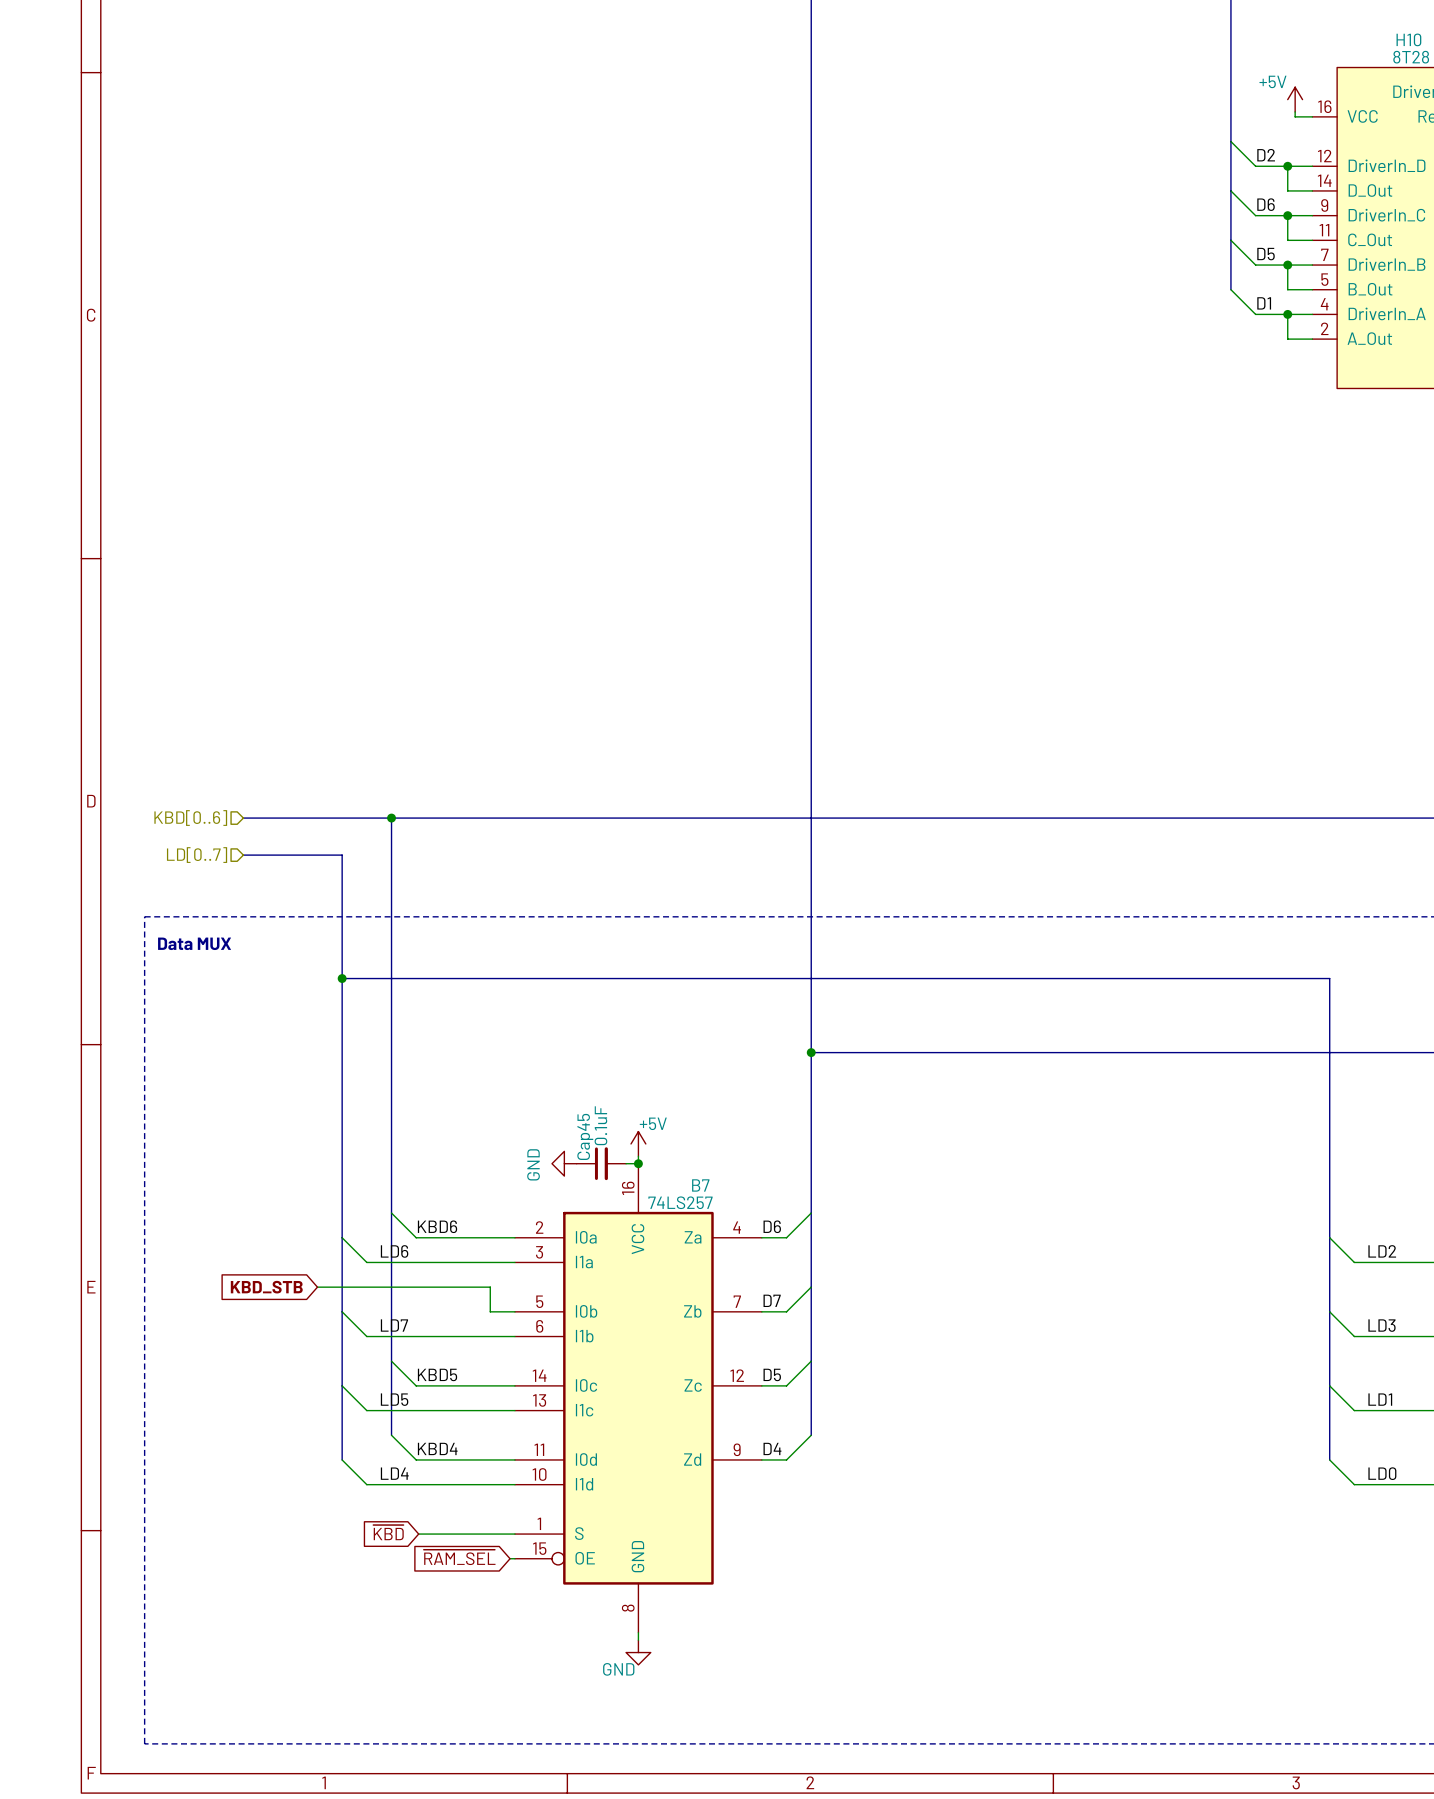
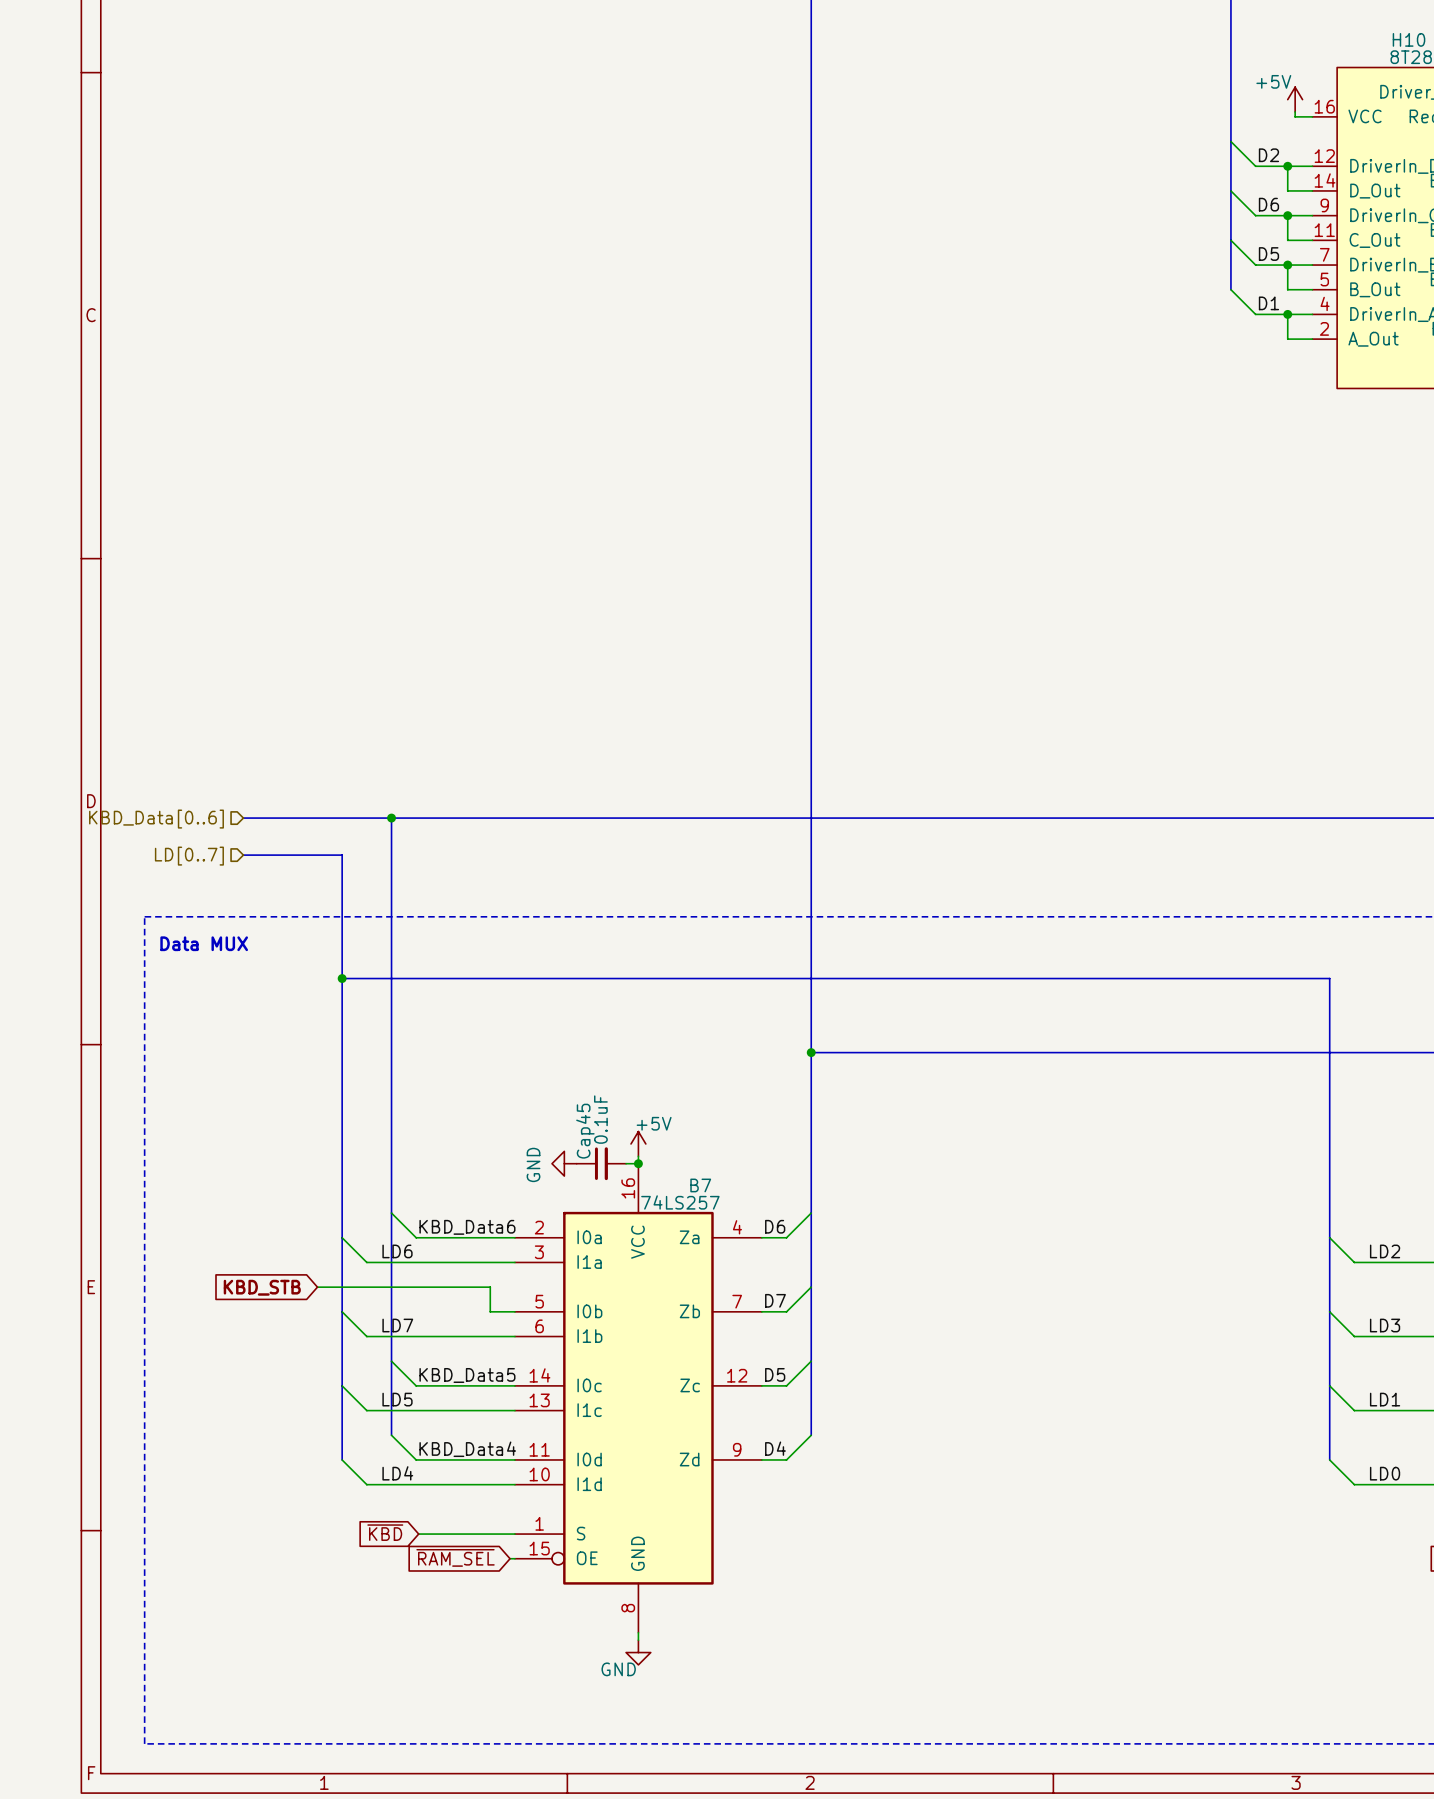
hierarchical label: KBD[0..6] (190, 818) -> KBD_Data[0..6] (156, 819)
label: KBD6 (437, 1226) -> KBD_Data6 (467, 1227)
label: KBD5 (437, 1374) -> KBD_Data5 (467, 1375)
label: KBD4 (437, 1448) -> KBD_Data4 (467, 1449)

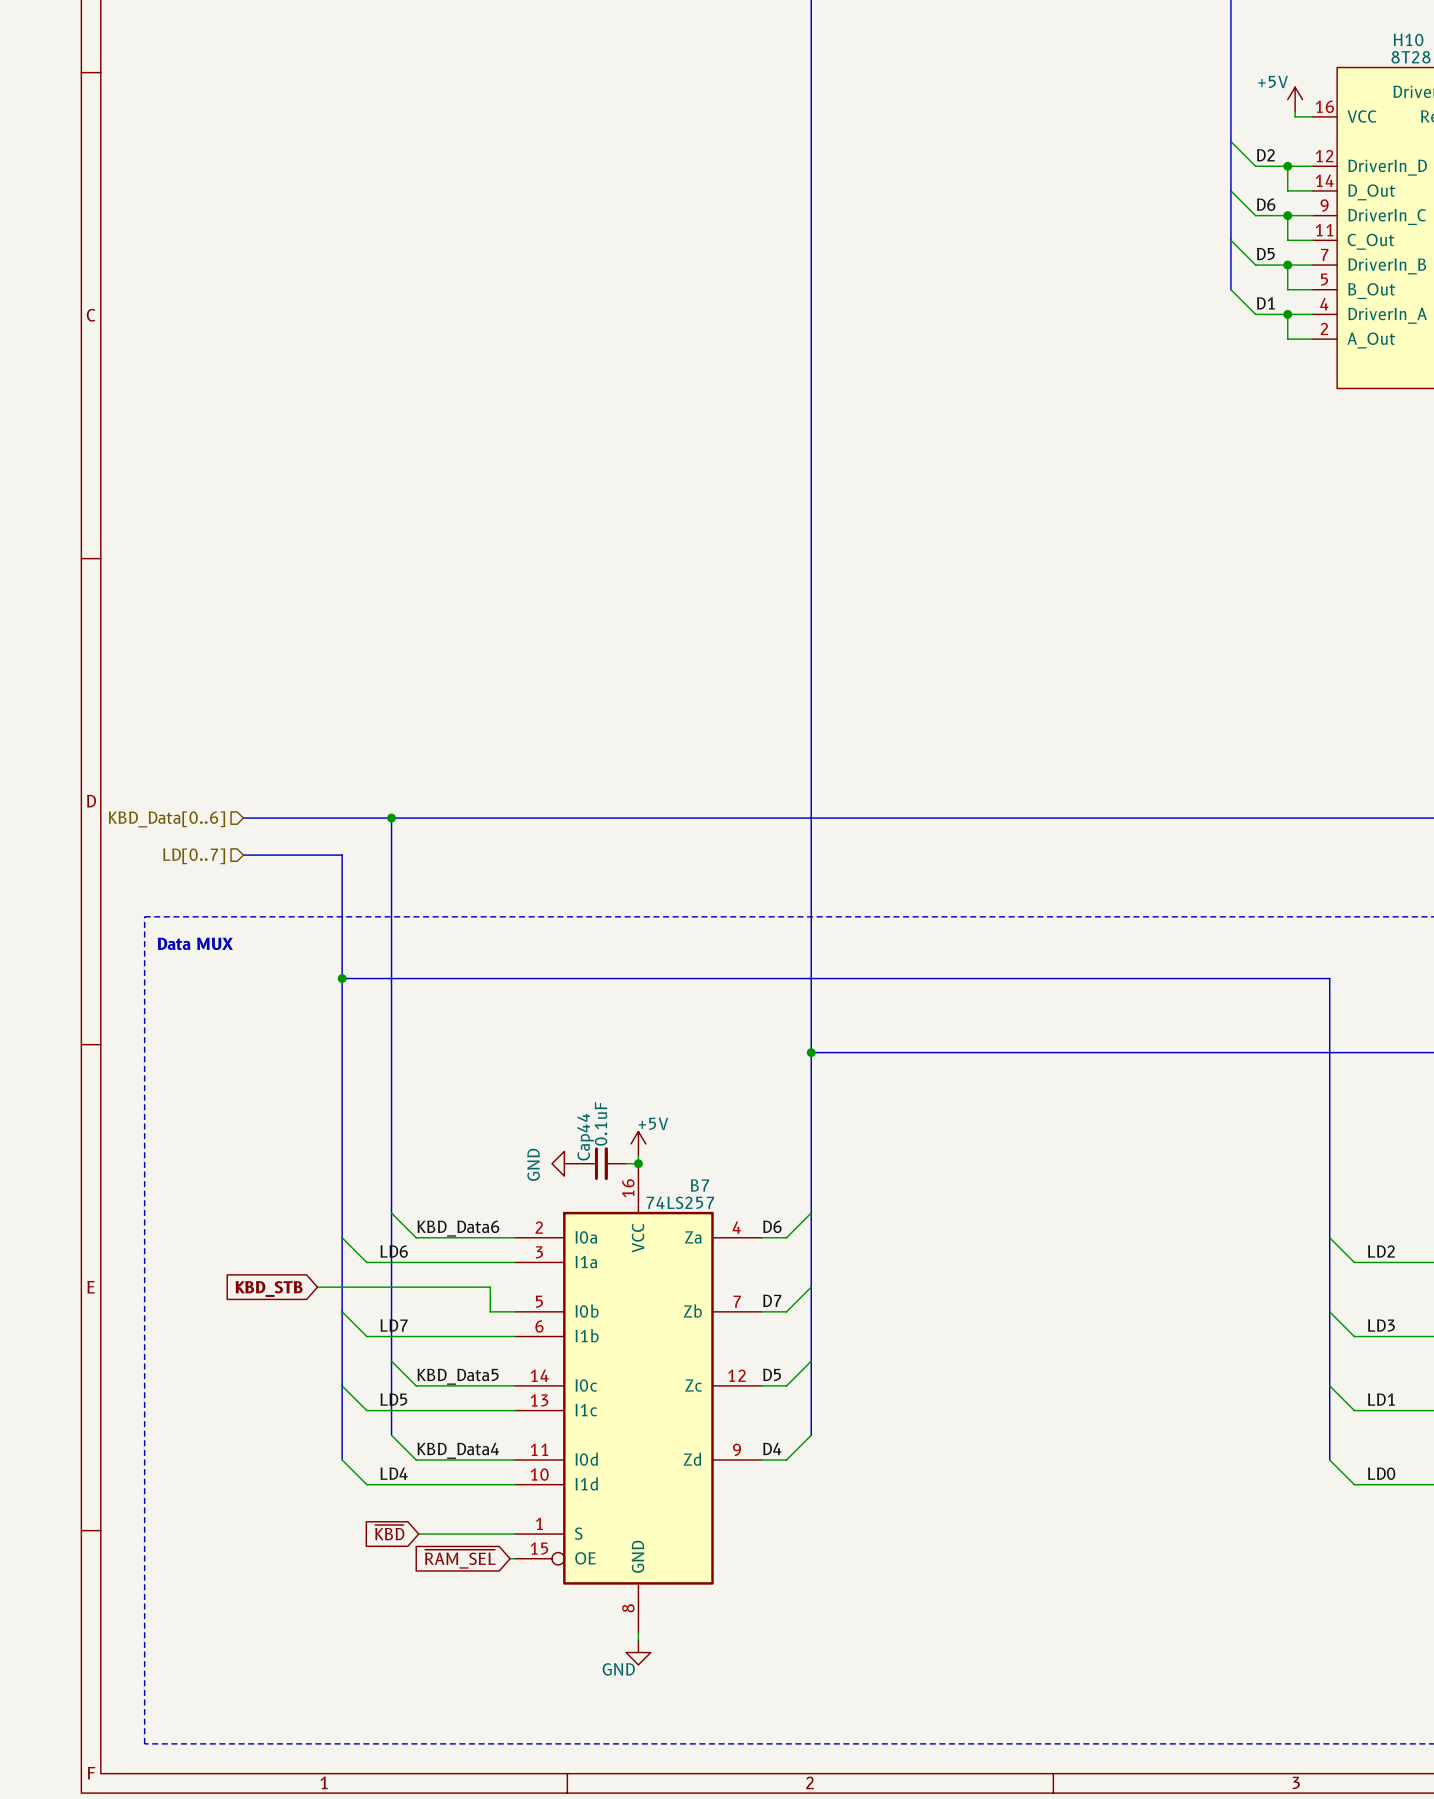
Cap45 name: Cap45 (585, 1131) -> Cap44 (585, 1137)

